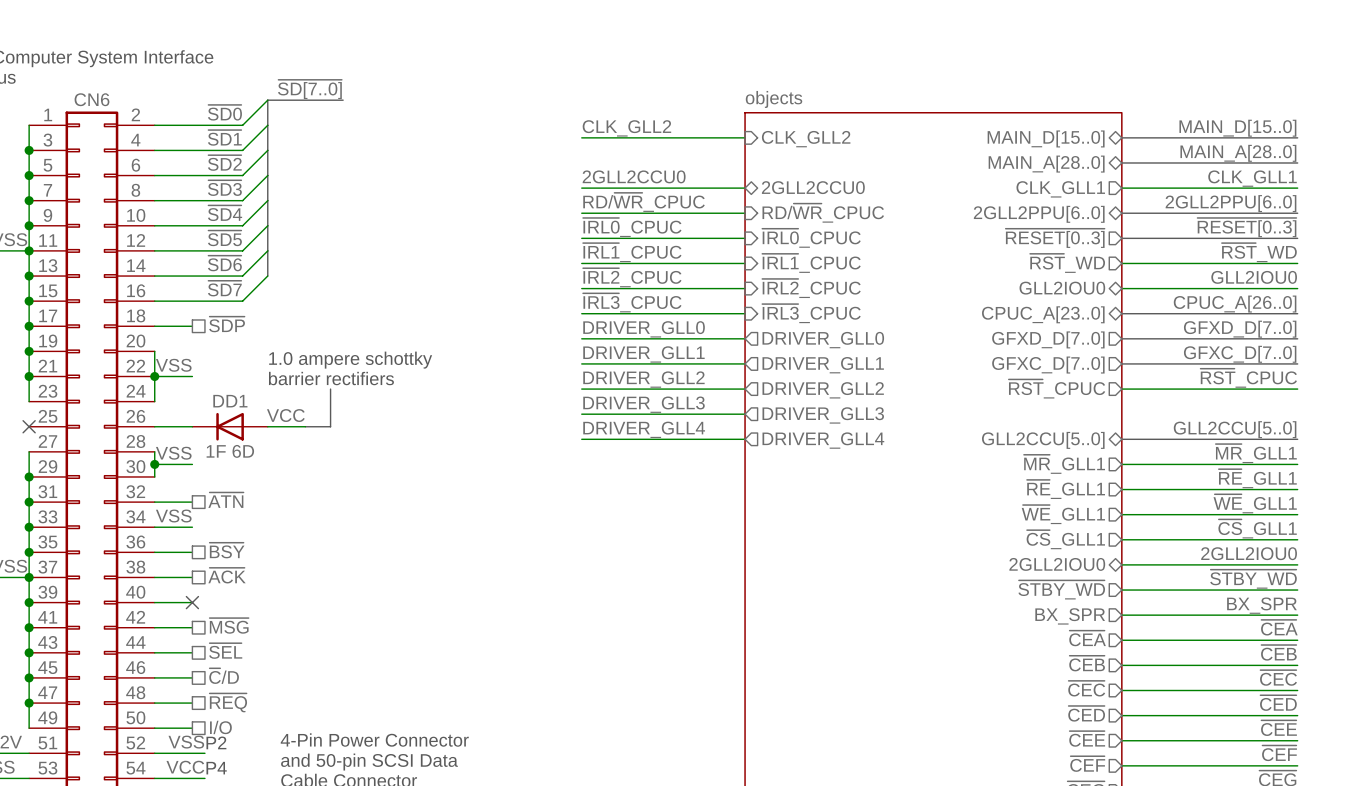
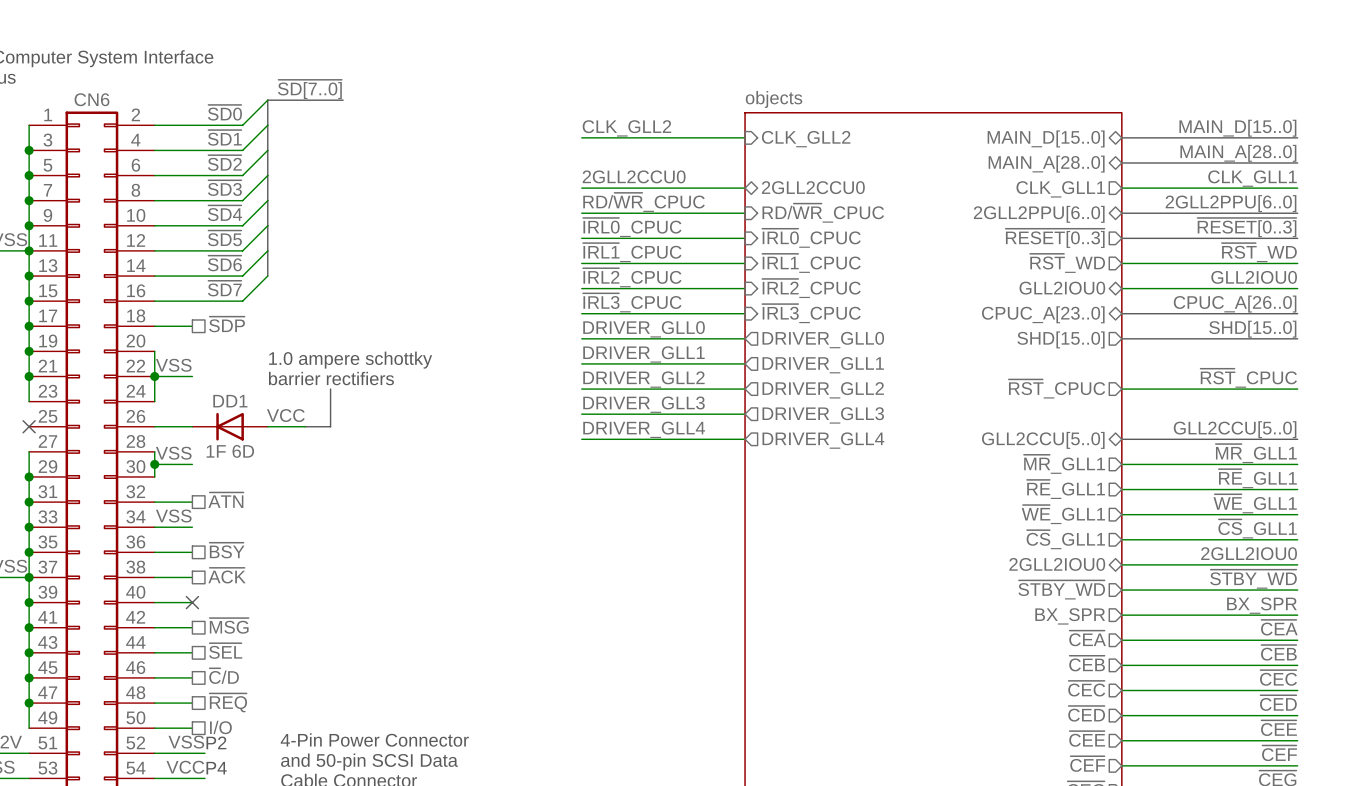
label: GFXD_D[7..0] (1240, 329) -> SHD[15..0] (1252, 329)
sheet pin: GFXD_D[7..0] (1048, 339) -> SHD[15..0] (1061, 339)
label: GFXC_D[7..0] (1240, 354) -> none
bus: (1121, 363) (1297, 363) -> none
sheet pin: GFXC_D[7..0] (1048, 365) -> none

